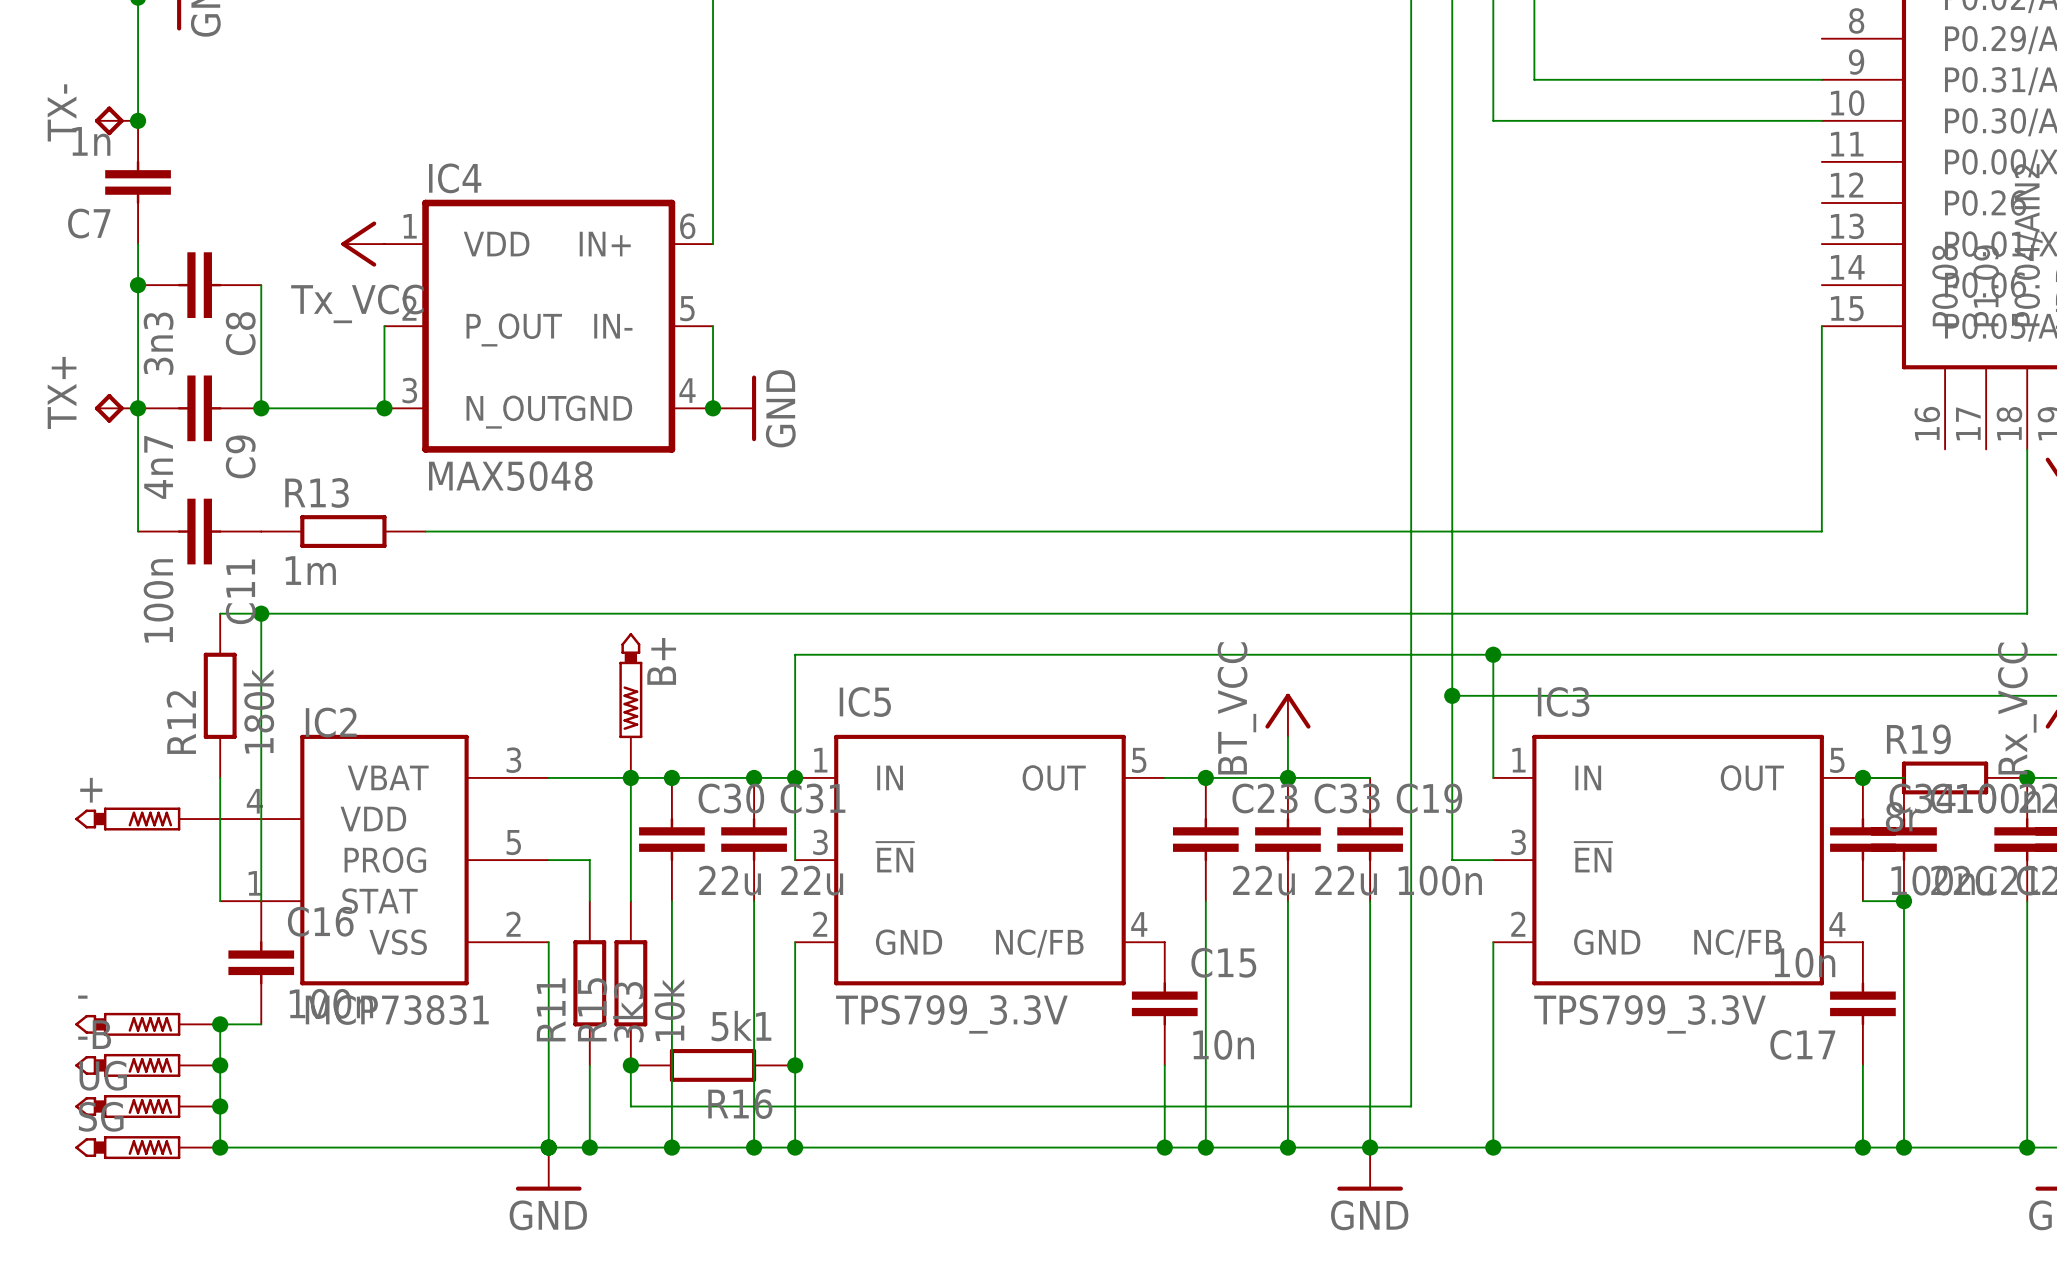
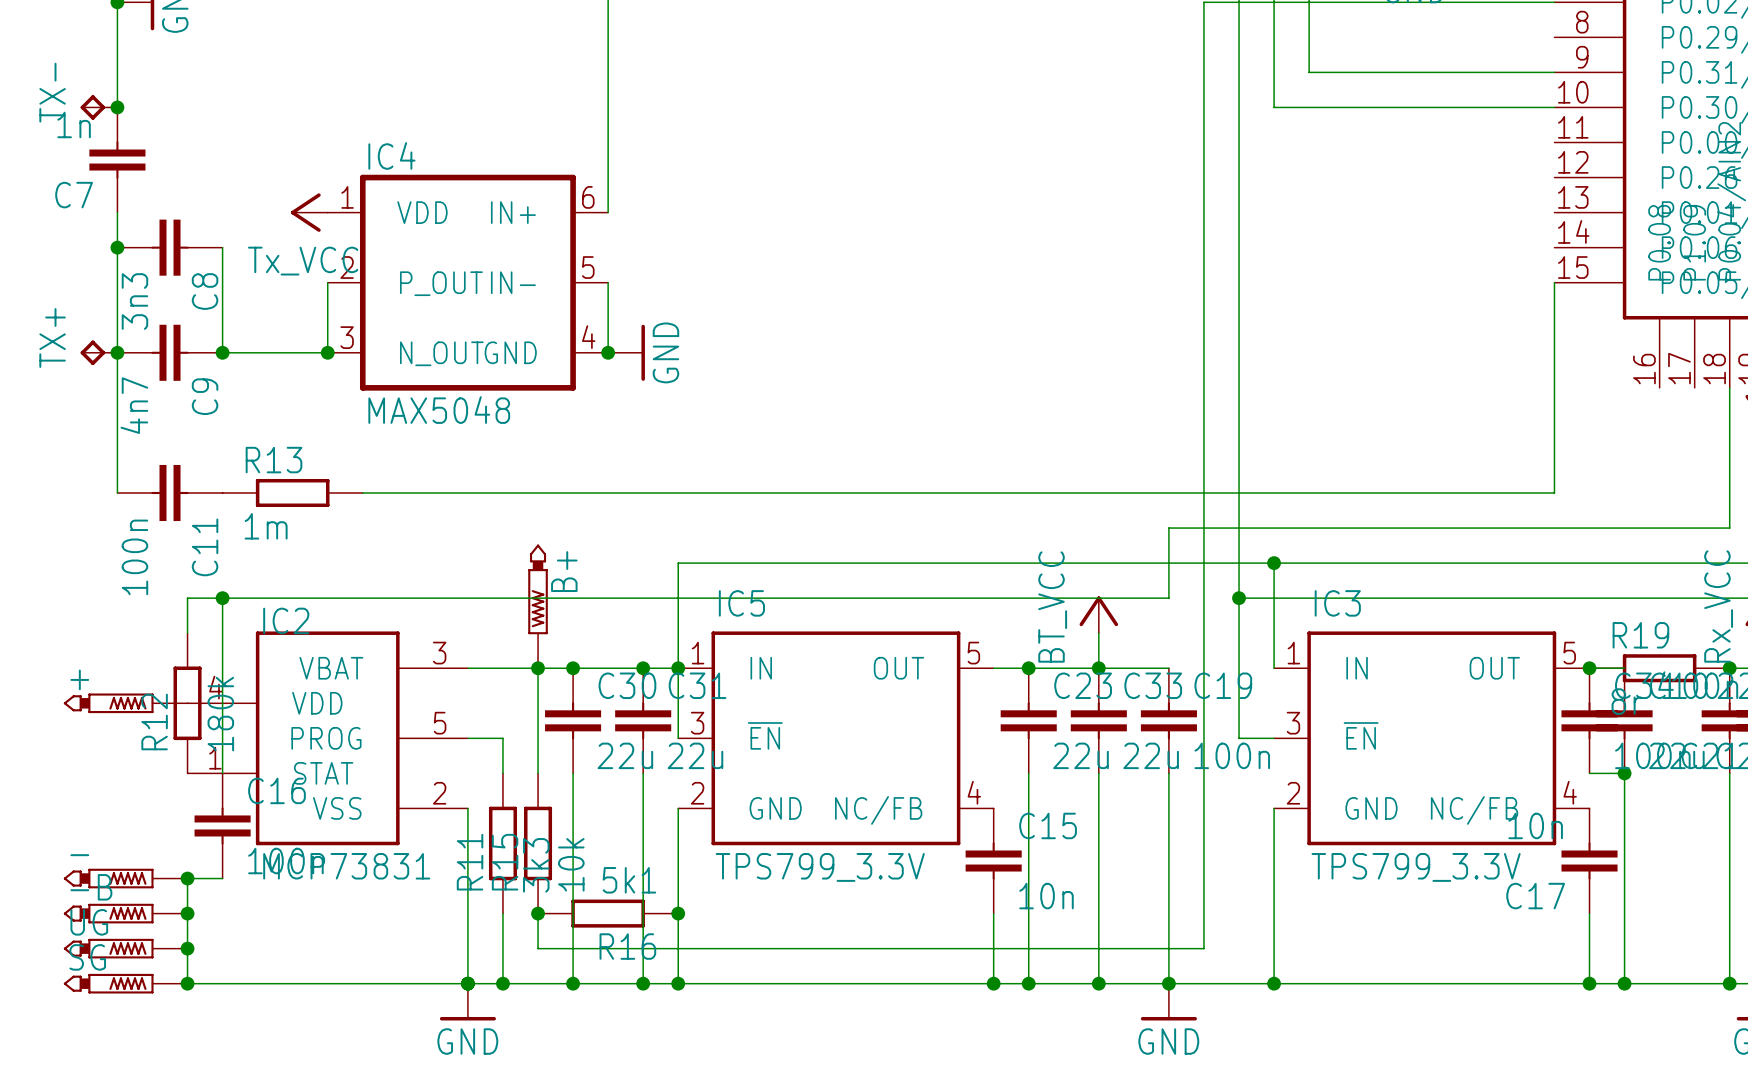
wire: none -> (117, 457) (117, 492)
C11 position: (199, 531) -> (170, 492)
R13 position: (343, 531) -> (292, 492)
wire: (425, 531) (1821, 531) -> (362, 492) (1554, 492) (1554, 457)
wire: (220, 613) (1370, 613) -> (187, 633) (187, 598) (1168, 598) (1168, 528)
wire: (261, 613) (261, 695) -> none
junction position: (261, 613) -> (222, 598)
R12 position: (220, 695) -> (187, 703)
wire: (220, 777) (220, 901) -> none

